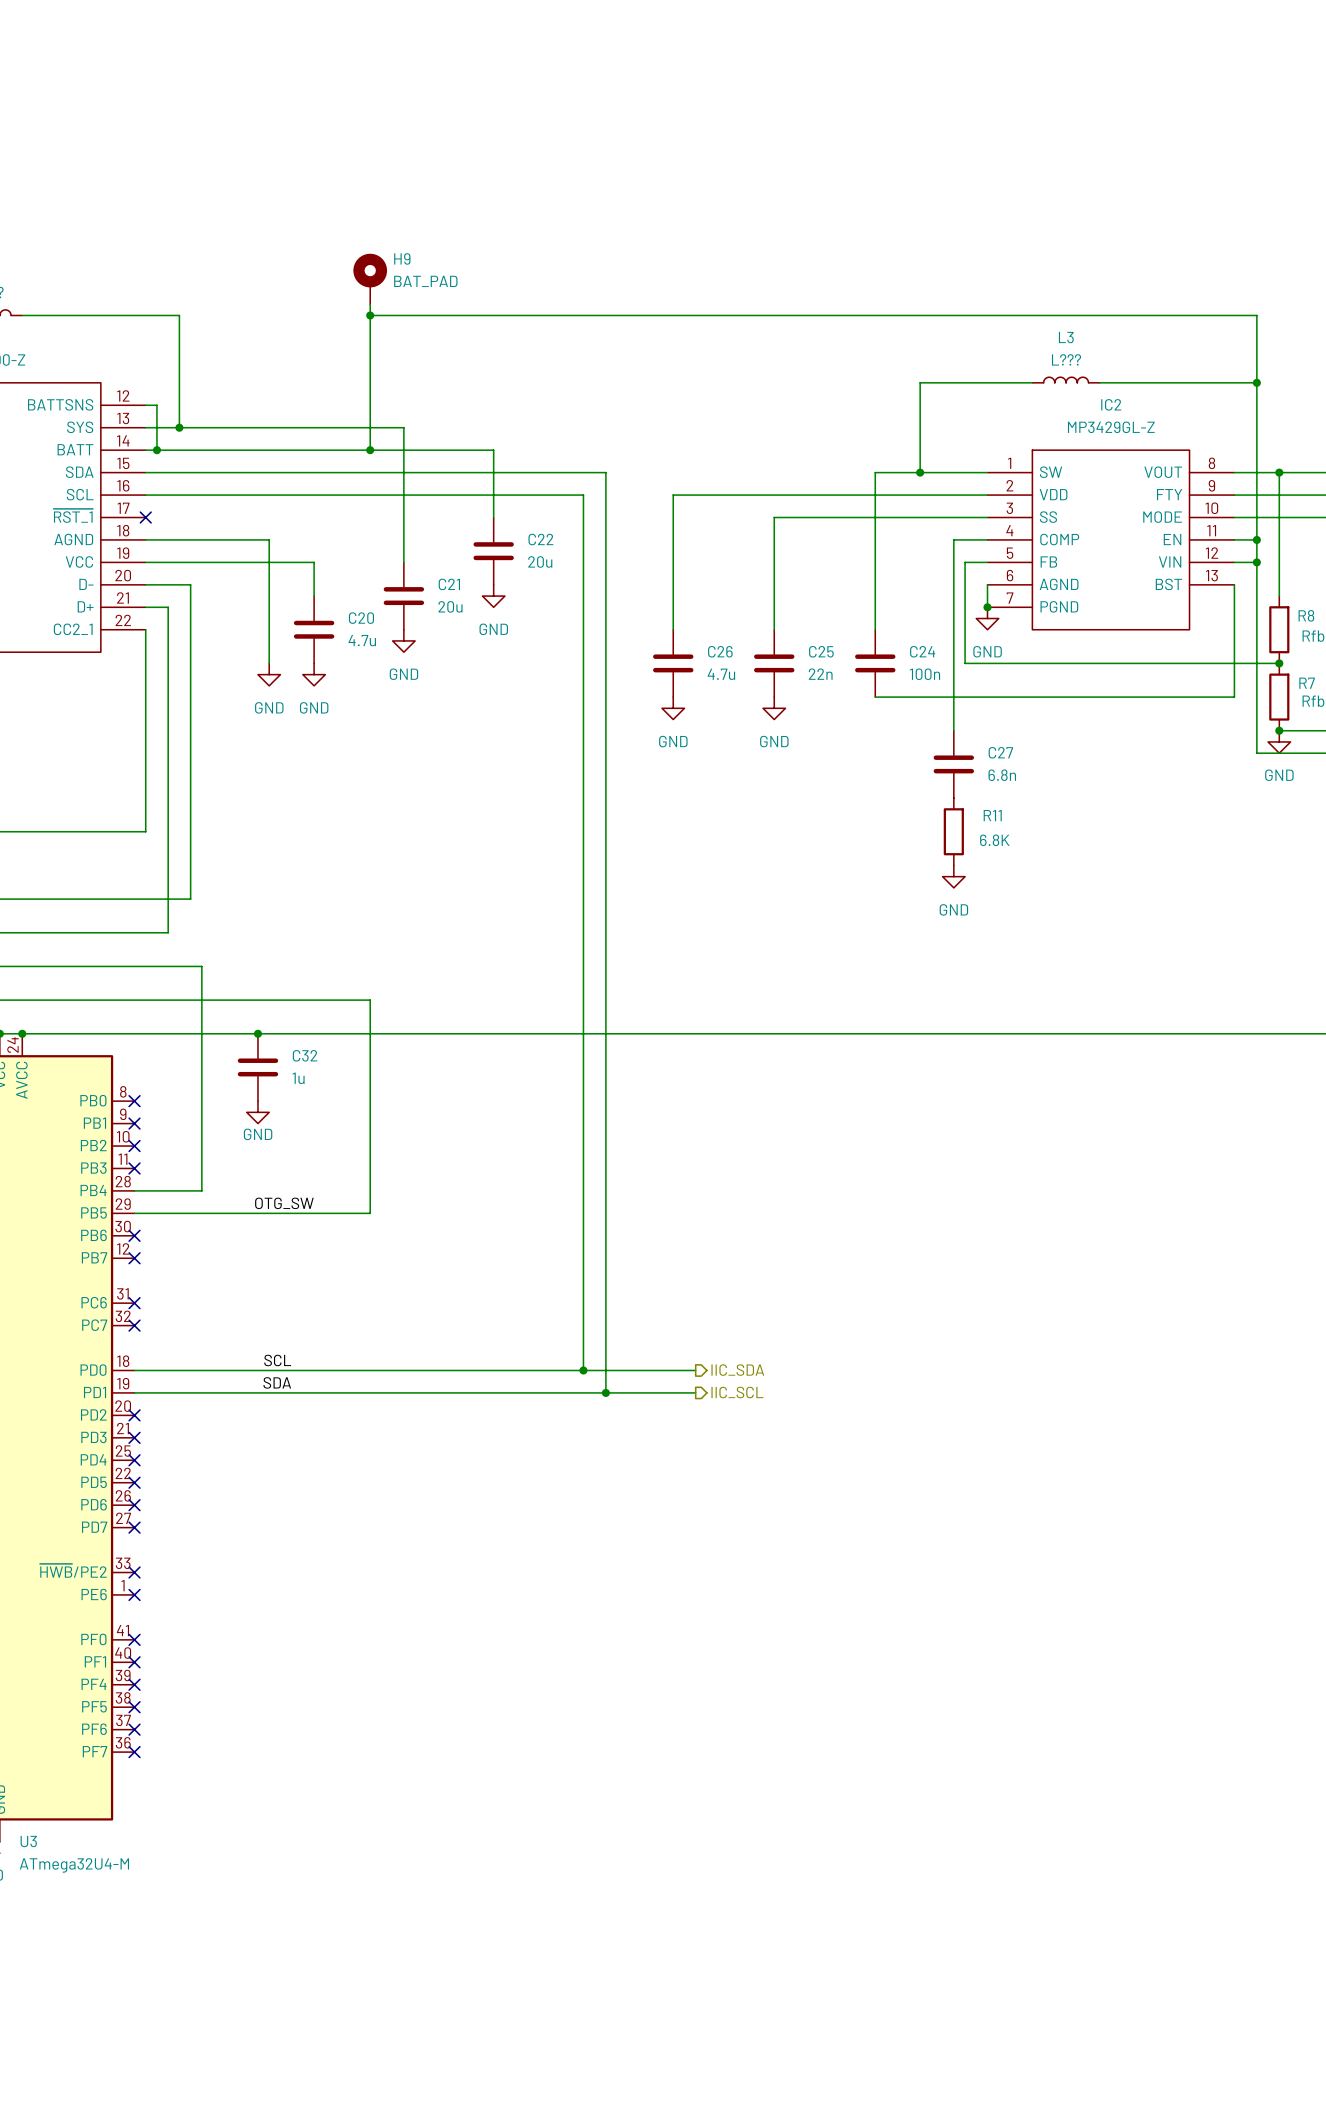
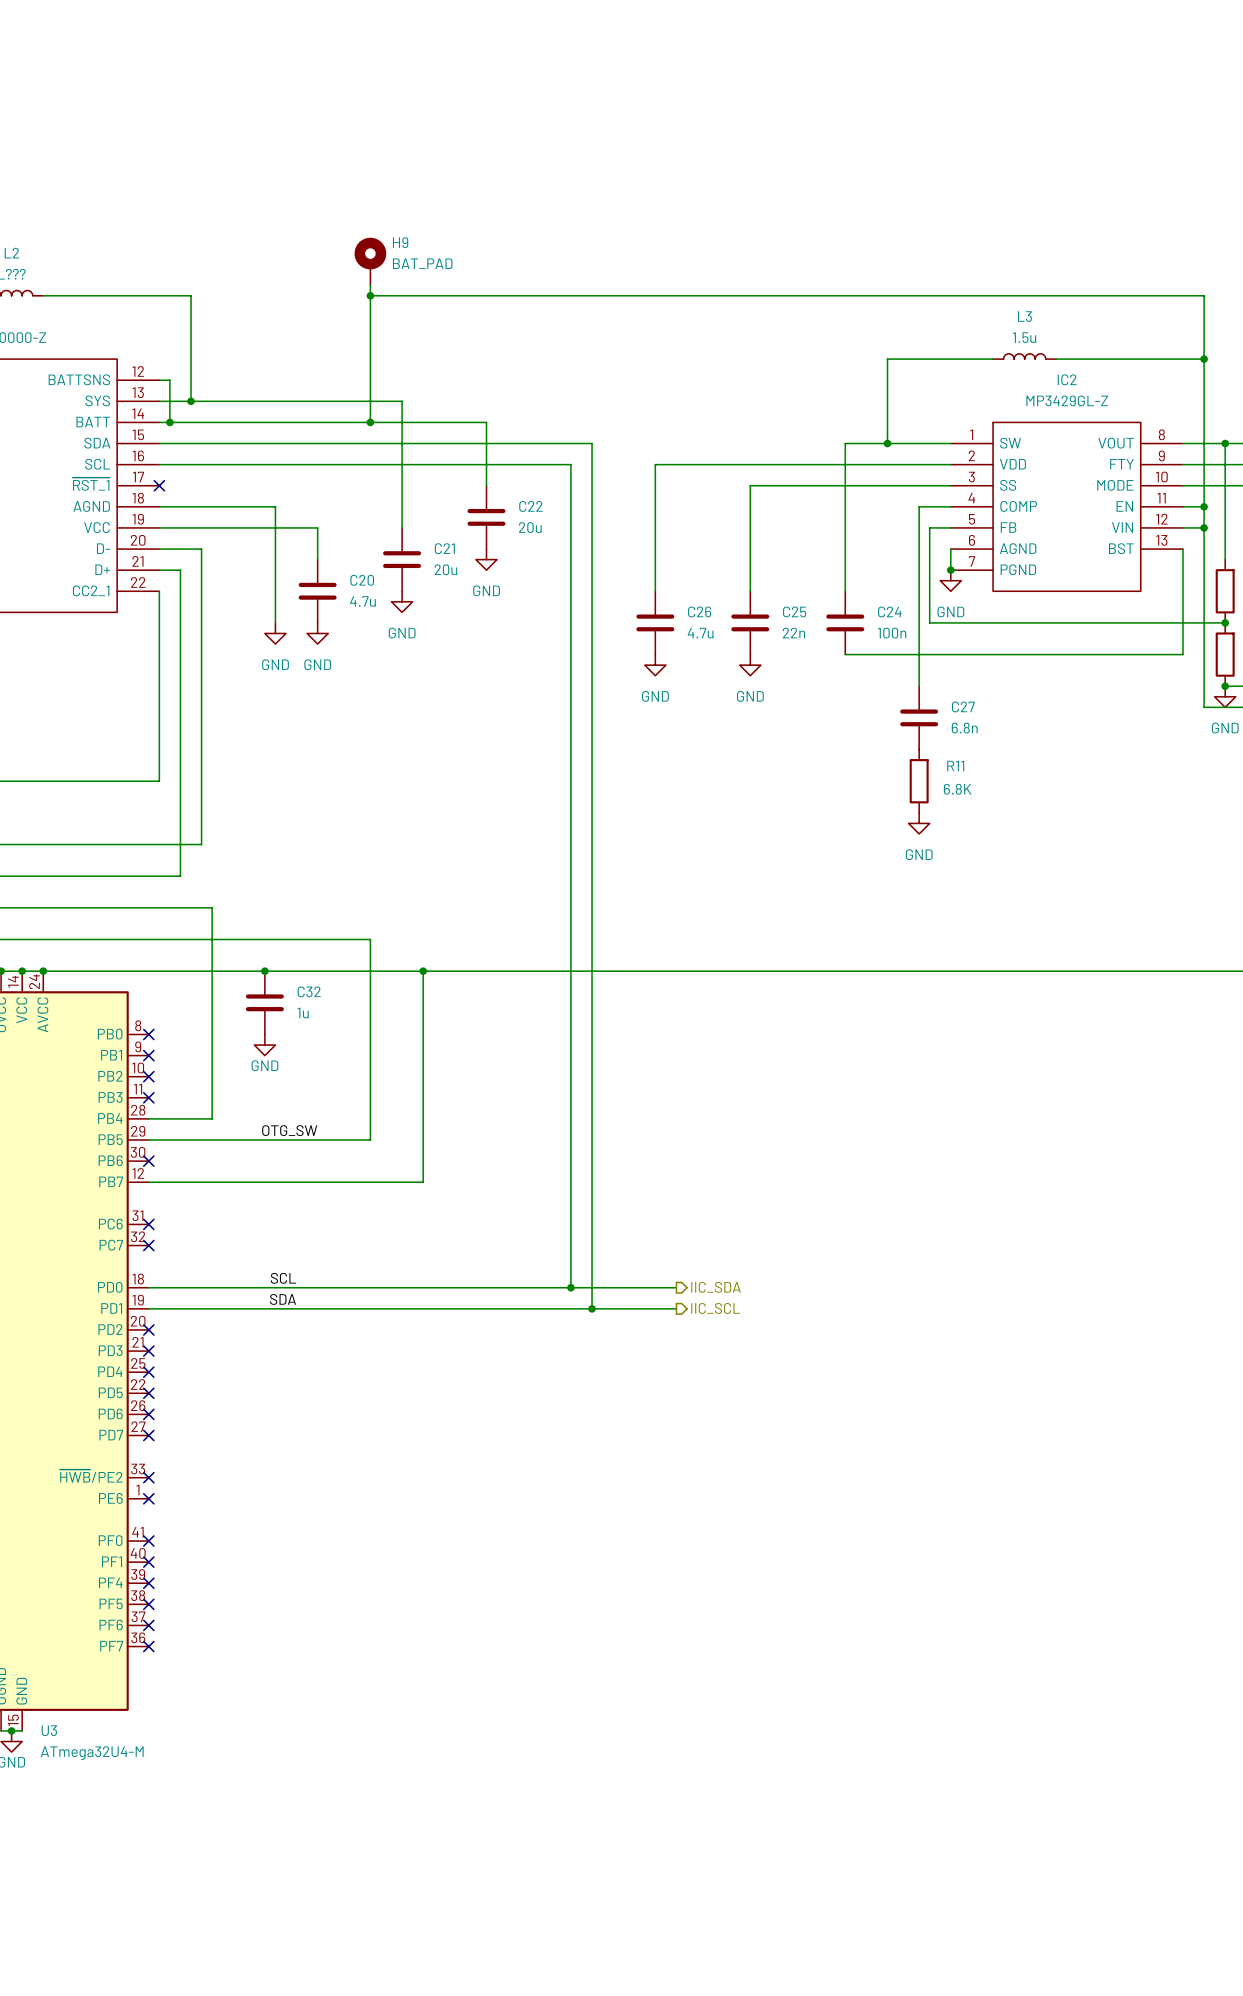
L3 value: L??? (1066, 359) -> 1.5u (1024, 337)
wire: none -> (423, 971) (423, 1182) (148, 1182)
junction: none -> (423, 971)
no-connect mark: (134, 1258) -> none

